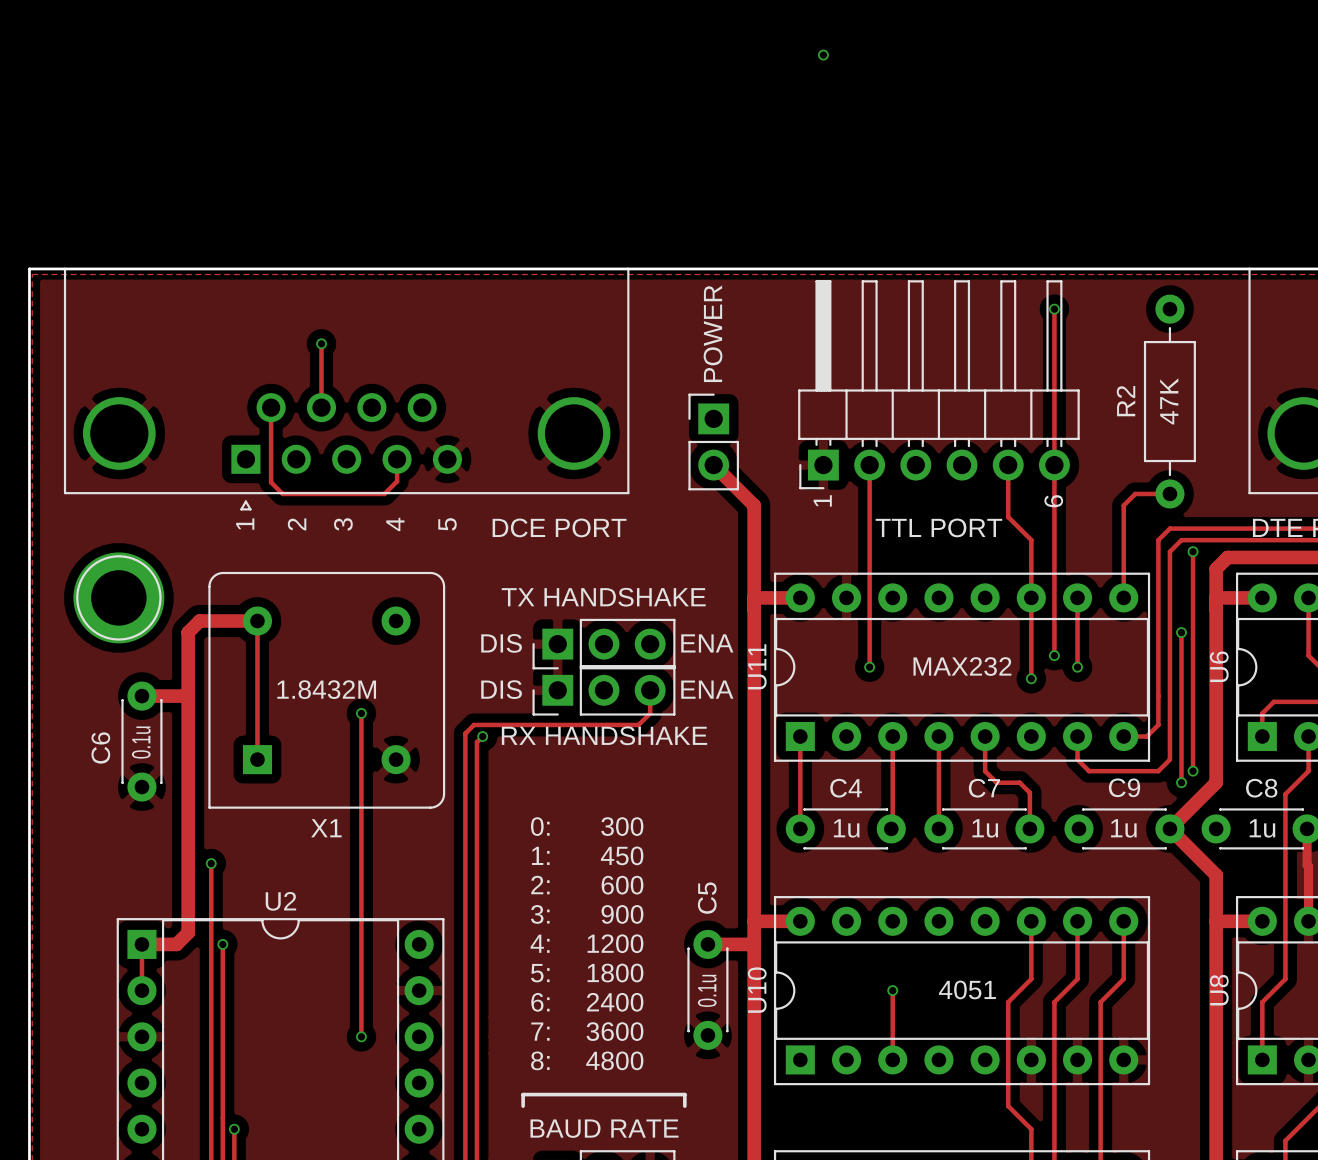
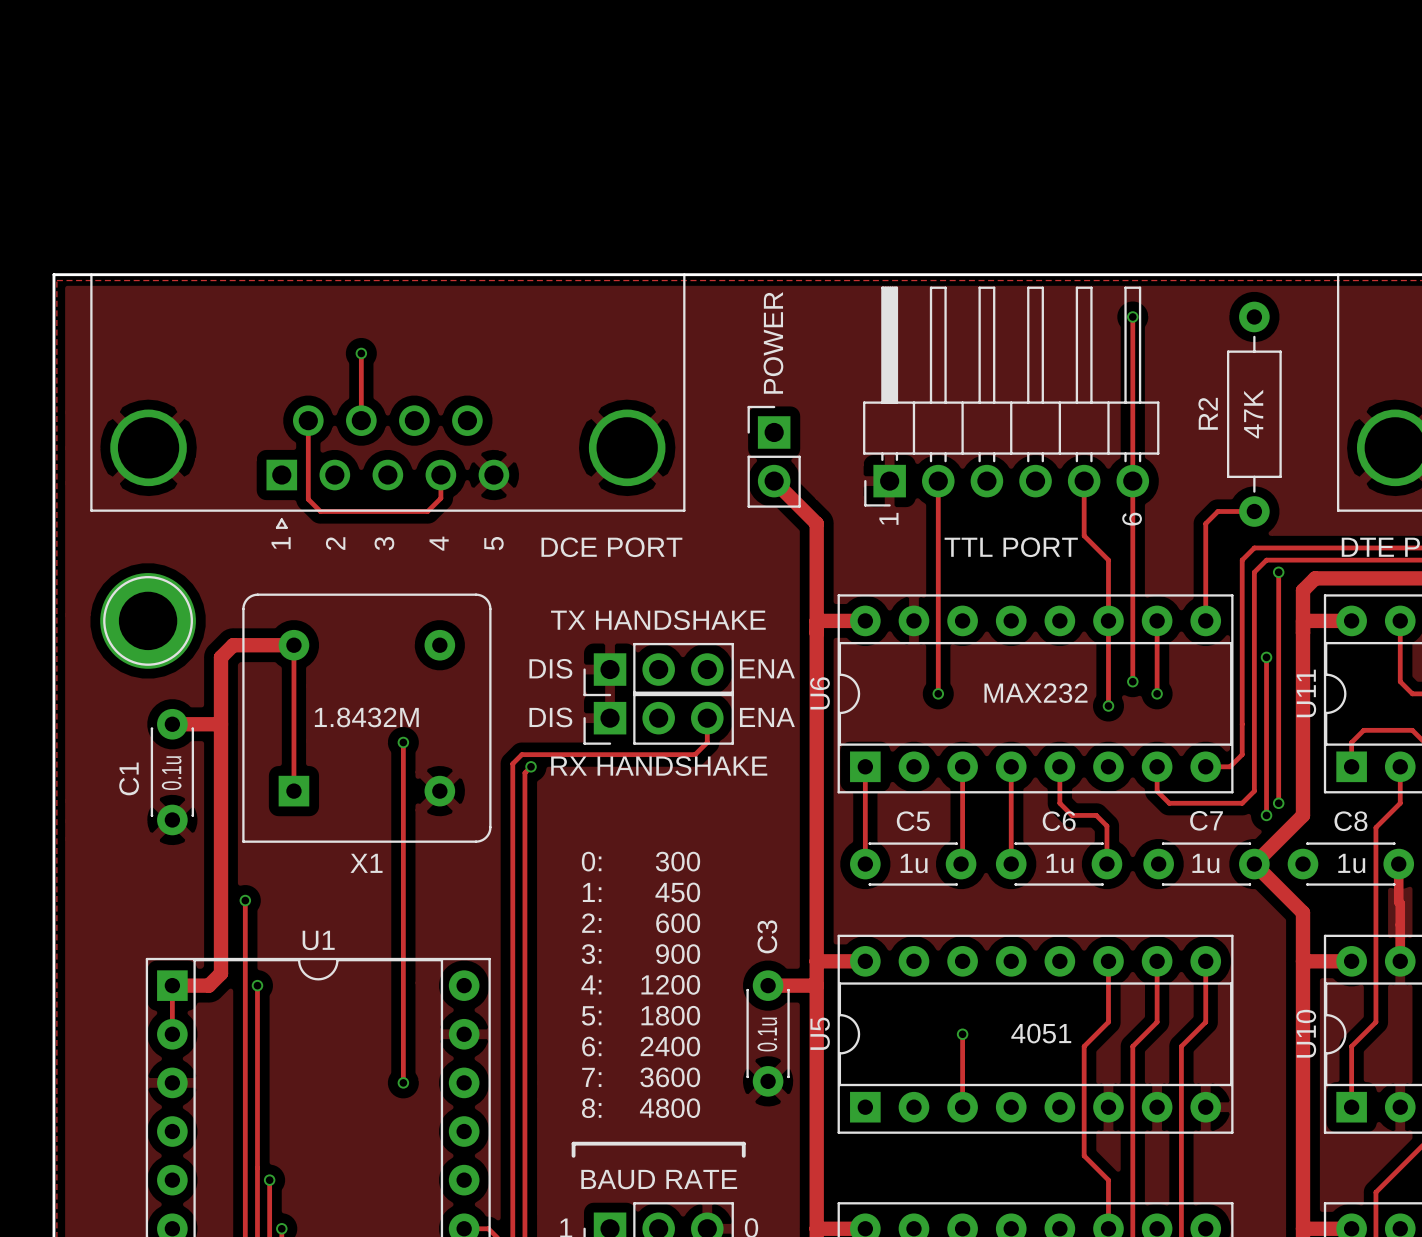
via: (823, 55) -> none
U11 name: U11 (757, 666) -> U6 (820, 693)
U6 name: U6 (1219, 666) -> U11 (1306, 693)
C6 name: C6 (100, 747) -> C1 (129, 778)
C9 name: C9 (1124, 787) -> C7 (1206, 820)
C4 name: C4 (846, 788) -> C5 (913, 821)
C7 name: C7 (984, 788) -> C6 (1059, 821)
C5 name: C5 (707, 898) -> C3 (767, 936)
U2 name: U2 (280, 901) -> U1 (318, 940)
U10 name: U10 (757, 990) -> U5 (820, 1033)
U8 name: U8 (1219, 990) -> U10 (1306, 1033)

